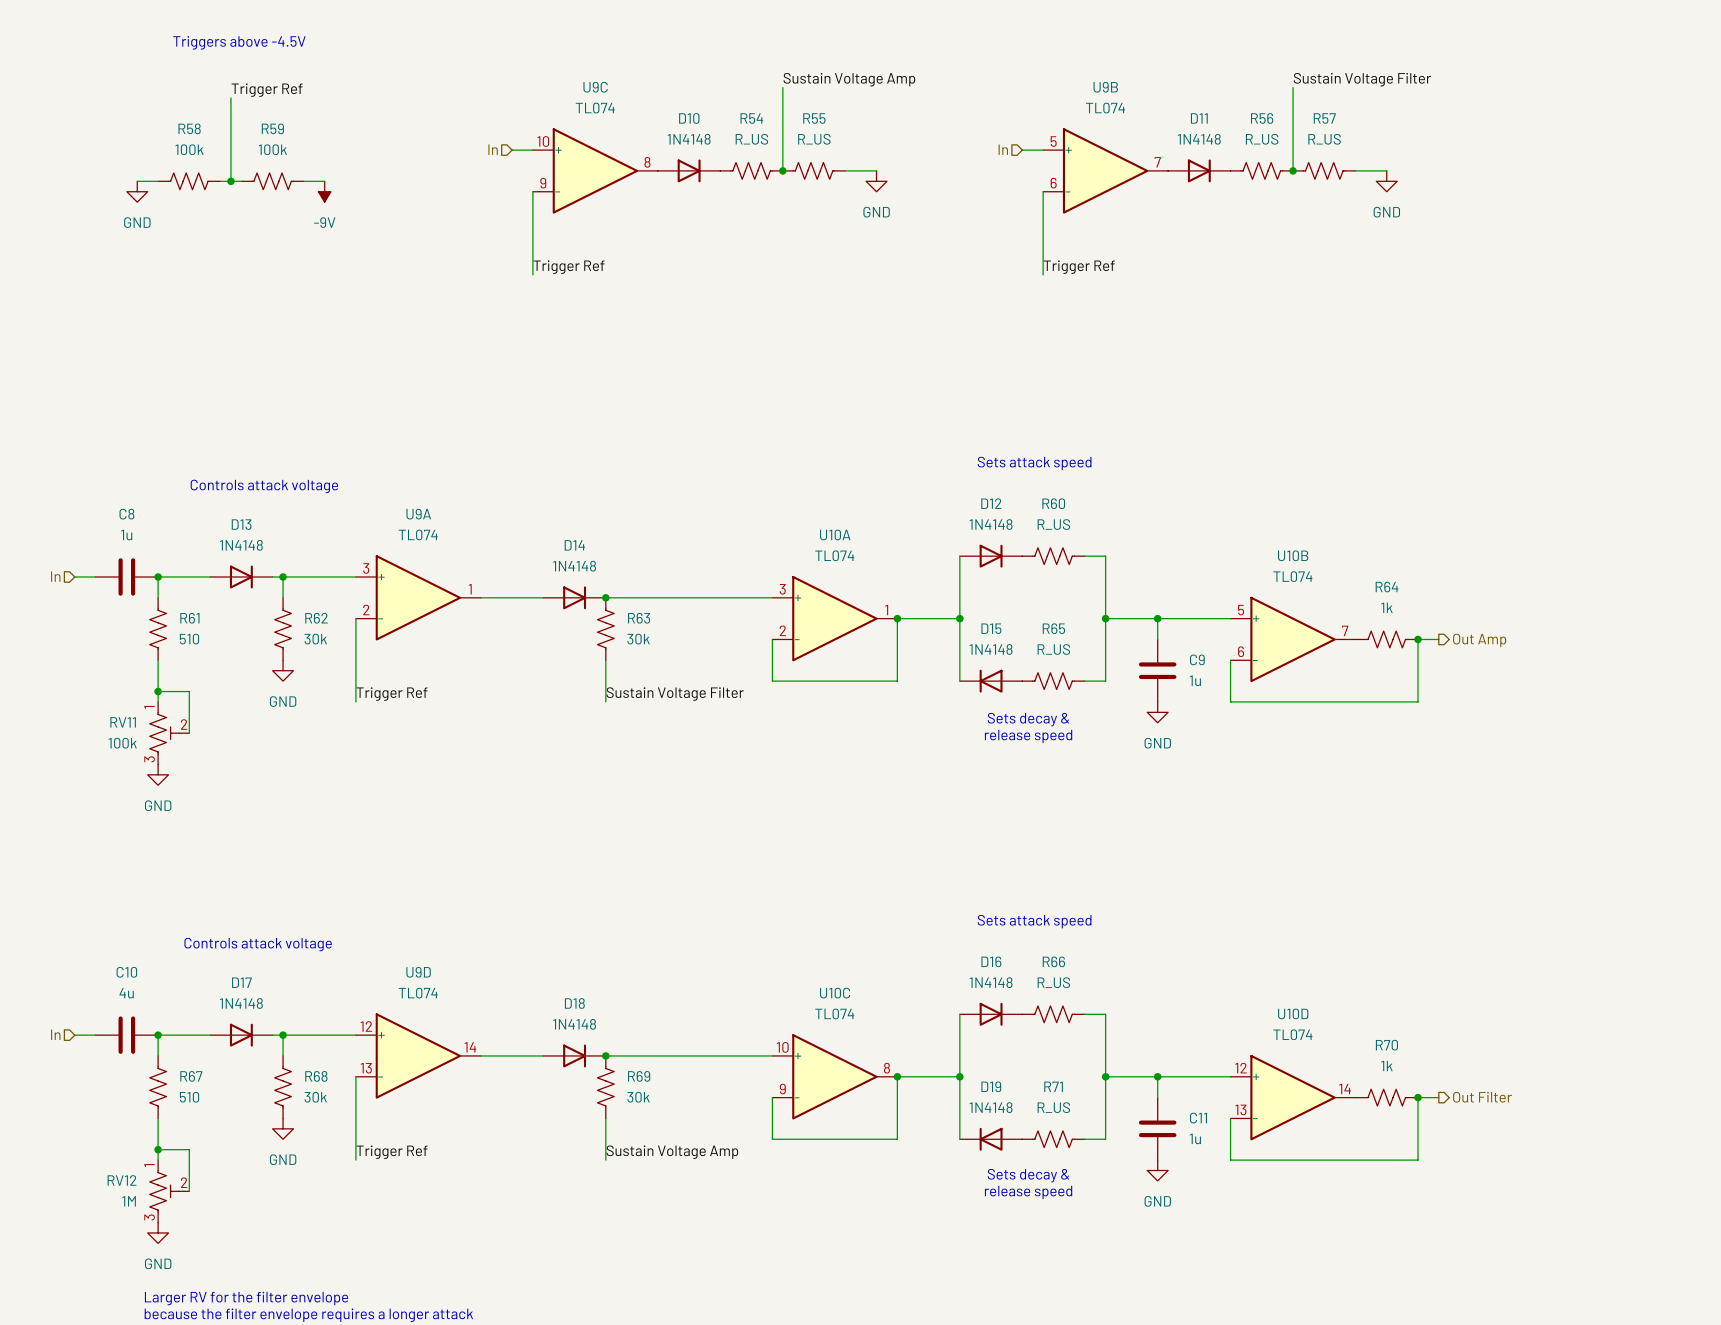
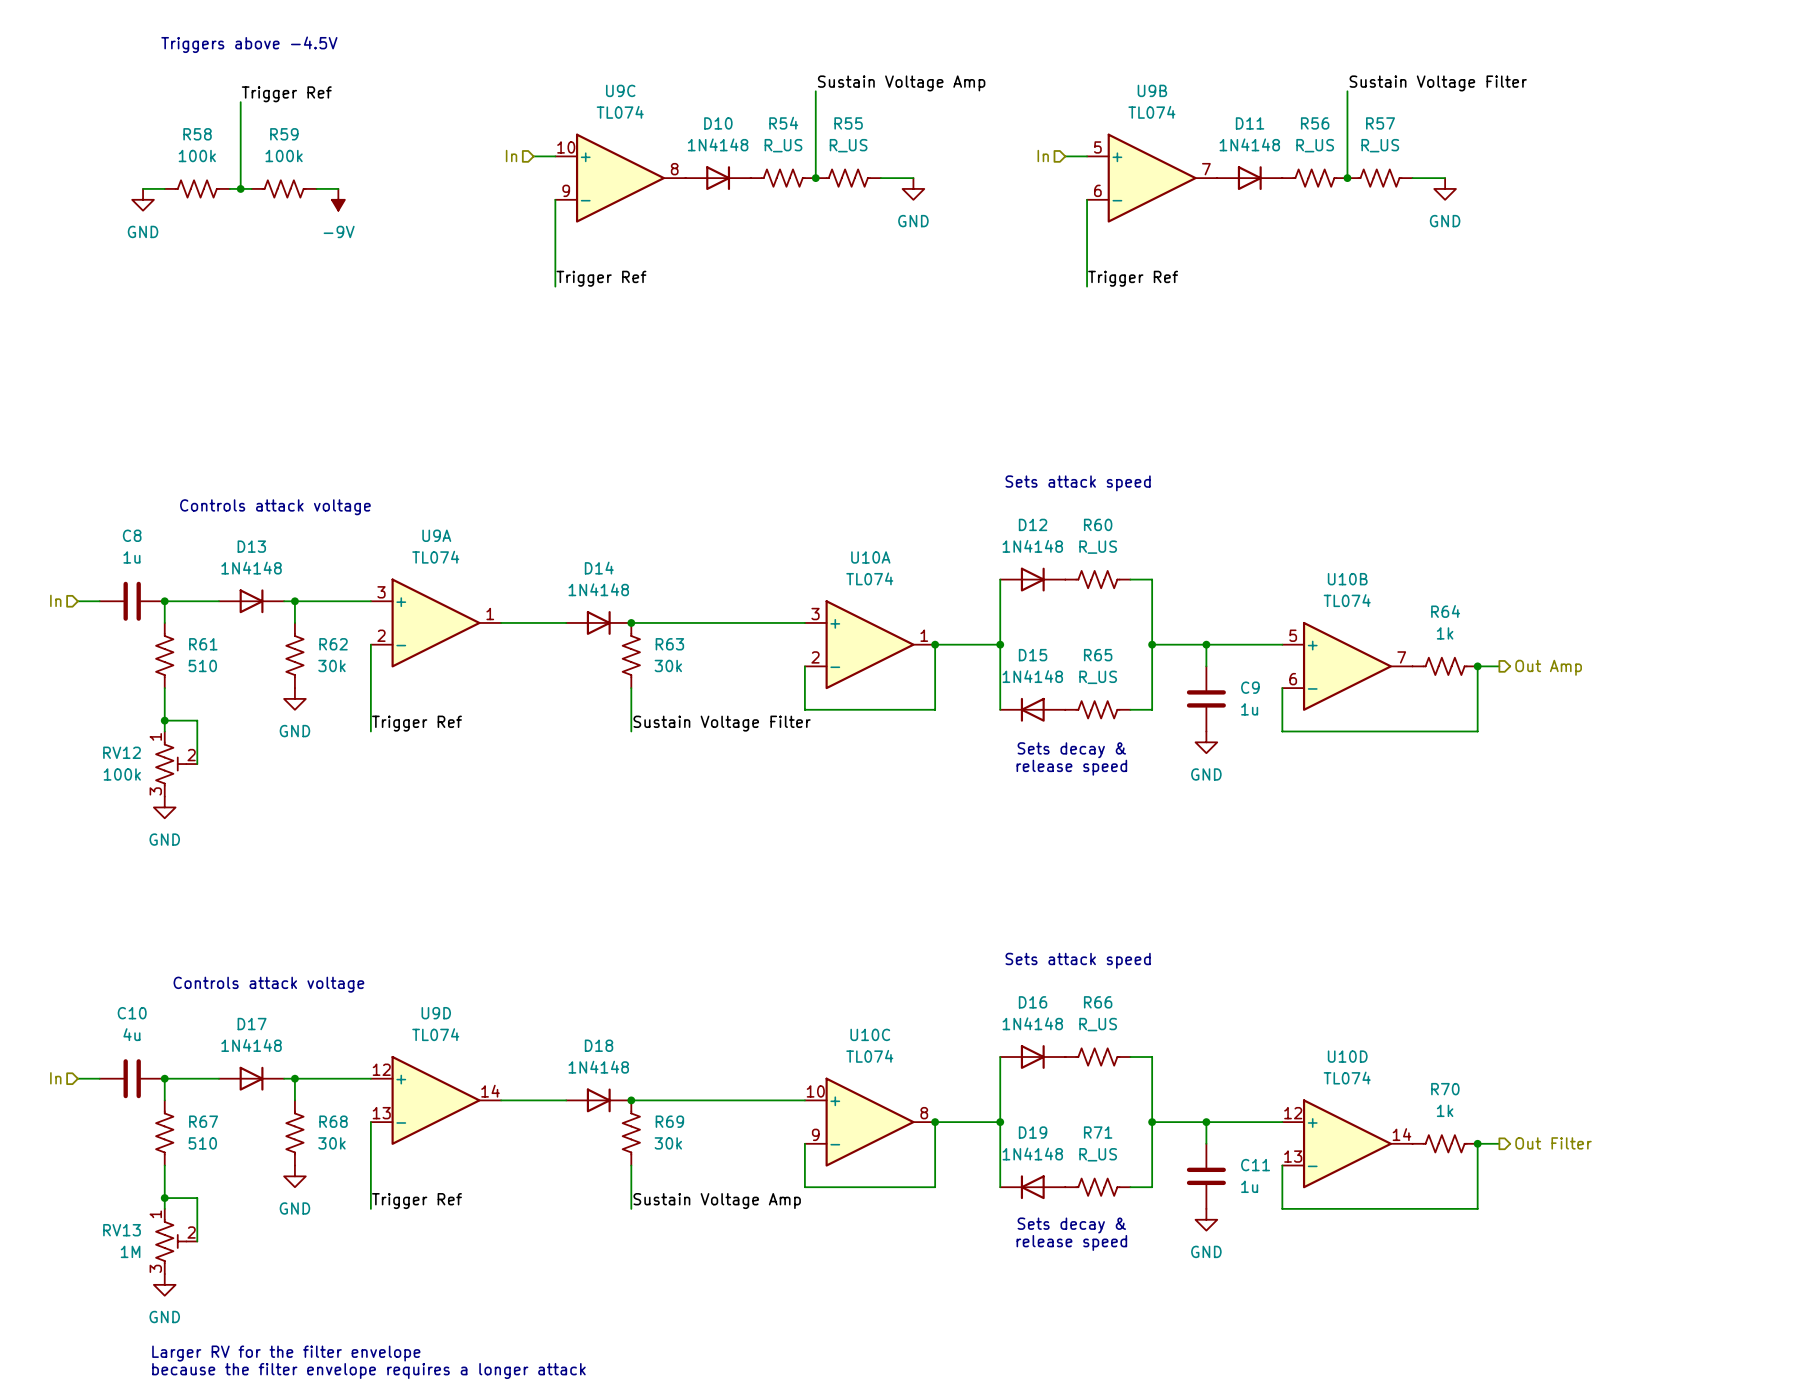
RV11 name: RV11 (123, 722) -> RV12 (122, 752)
RV12 name: RV12 (122, 1180) -> RV13 (122, 1230)

